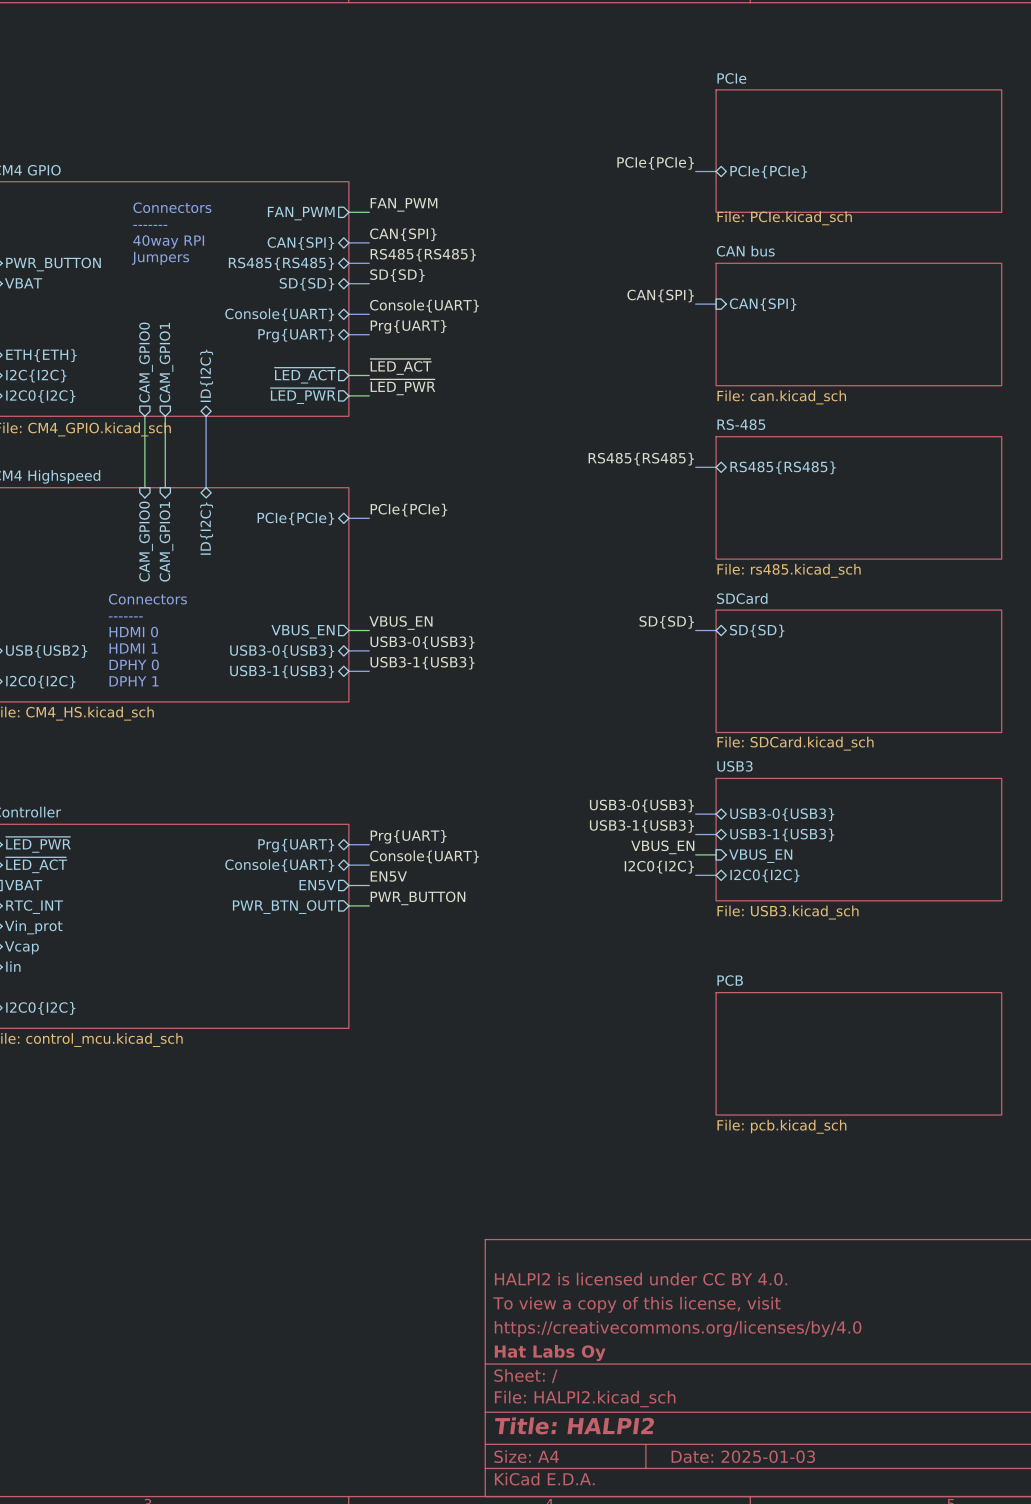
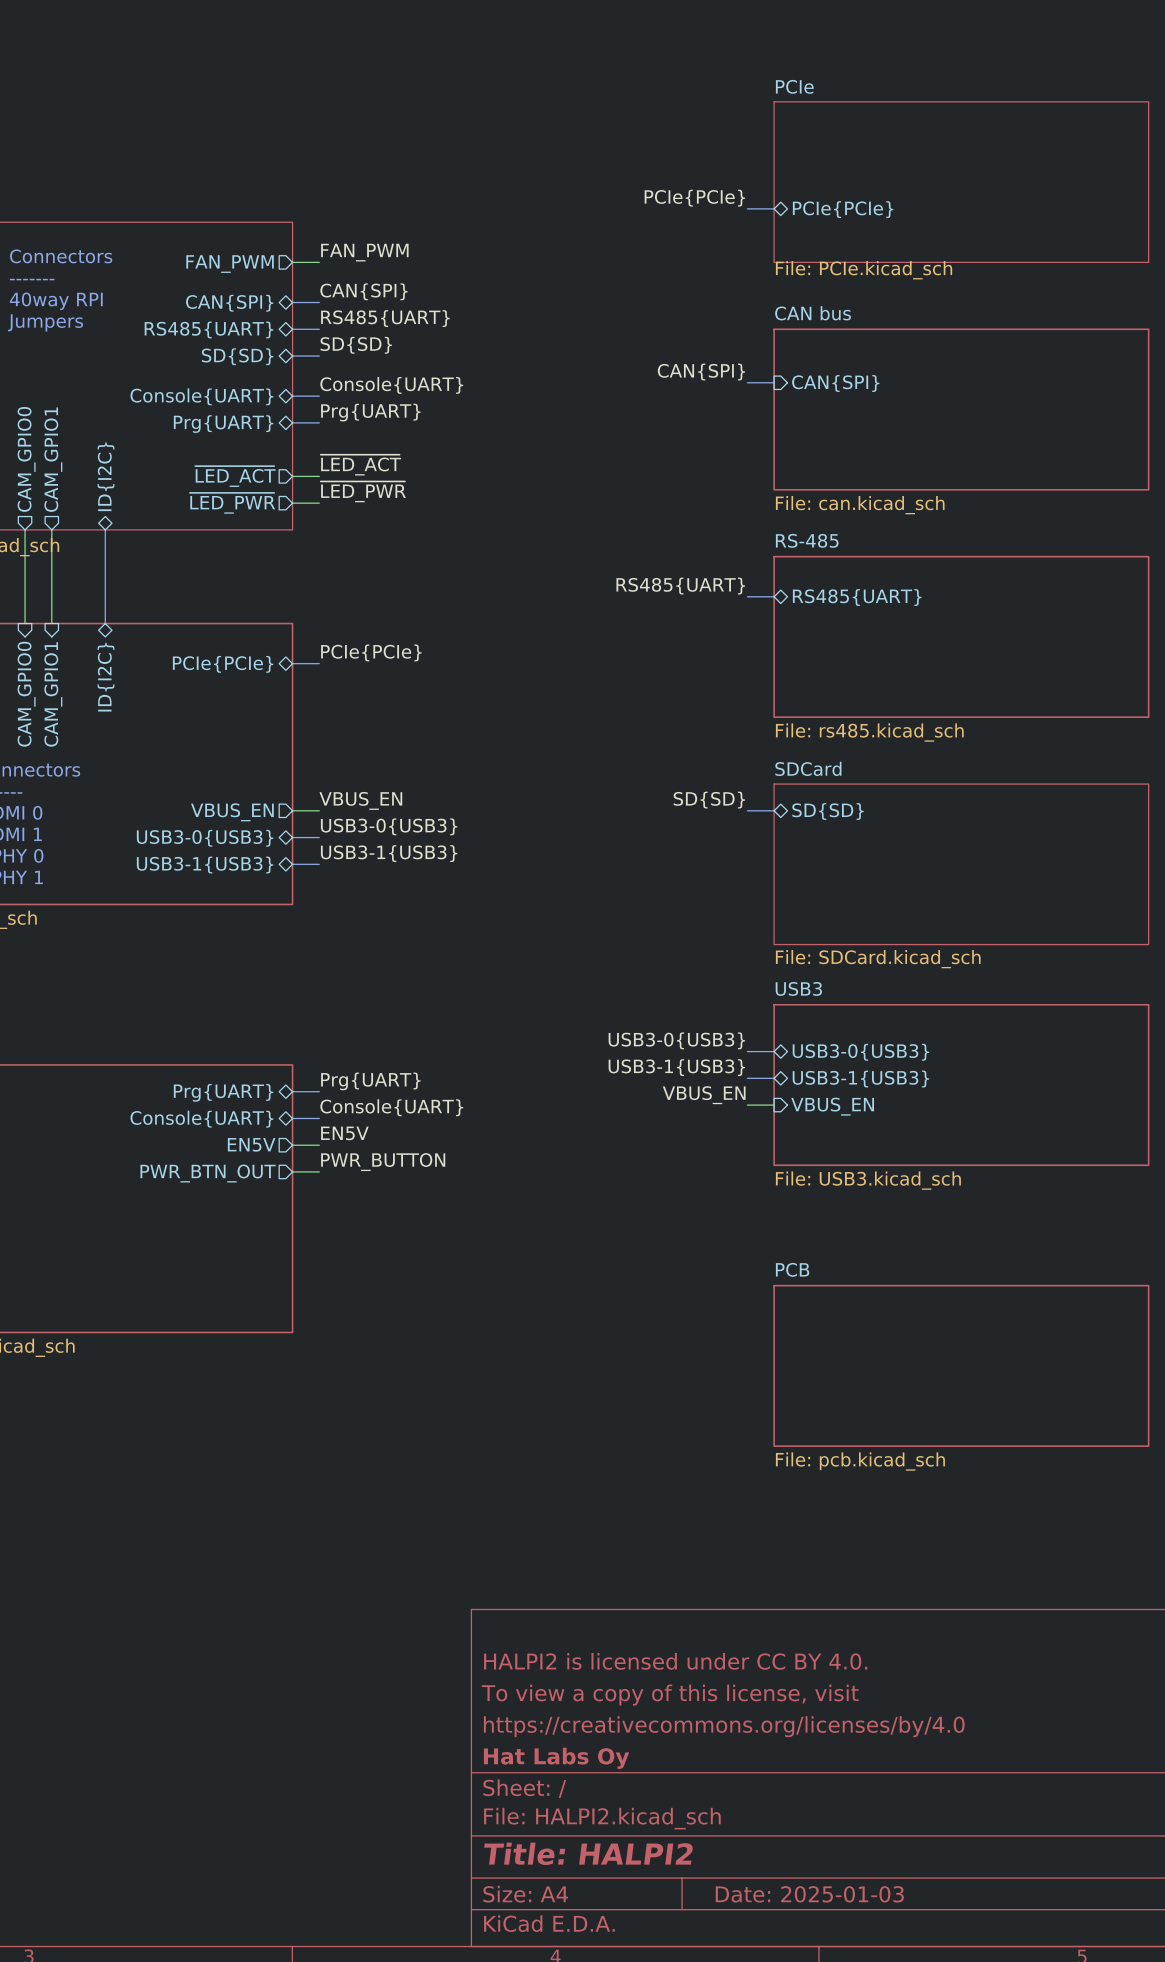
label: RS485{RS485} (423, 255) -> RS485{UART} (385, 318)
sheet pin: RS485{RS485} (281, 263) -> RS485{UART} (208, 329)
label: RS485{RS485} (641, 459) -> RS485{UART} (680, 586)
sheet pin: RS485{RS485} (783, 467) -> RS485{UART} (857, 597)
label: I2C0{I2C} (659, 867) -> none
bus: (695, 875) (716, 875) -> none
sheet pin: I2C0{I2C} (765, 875) -> none

